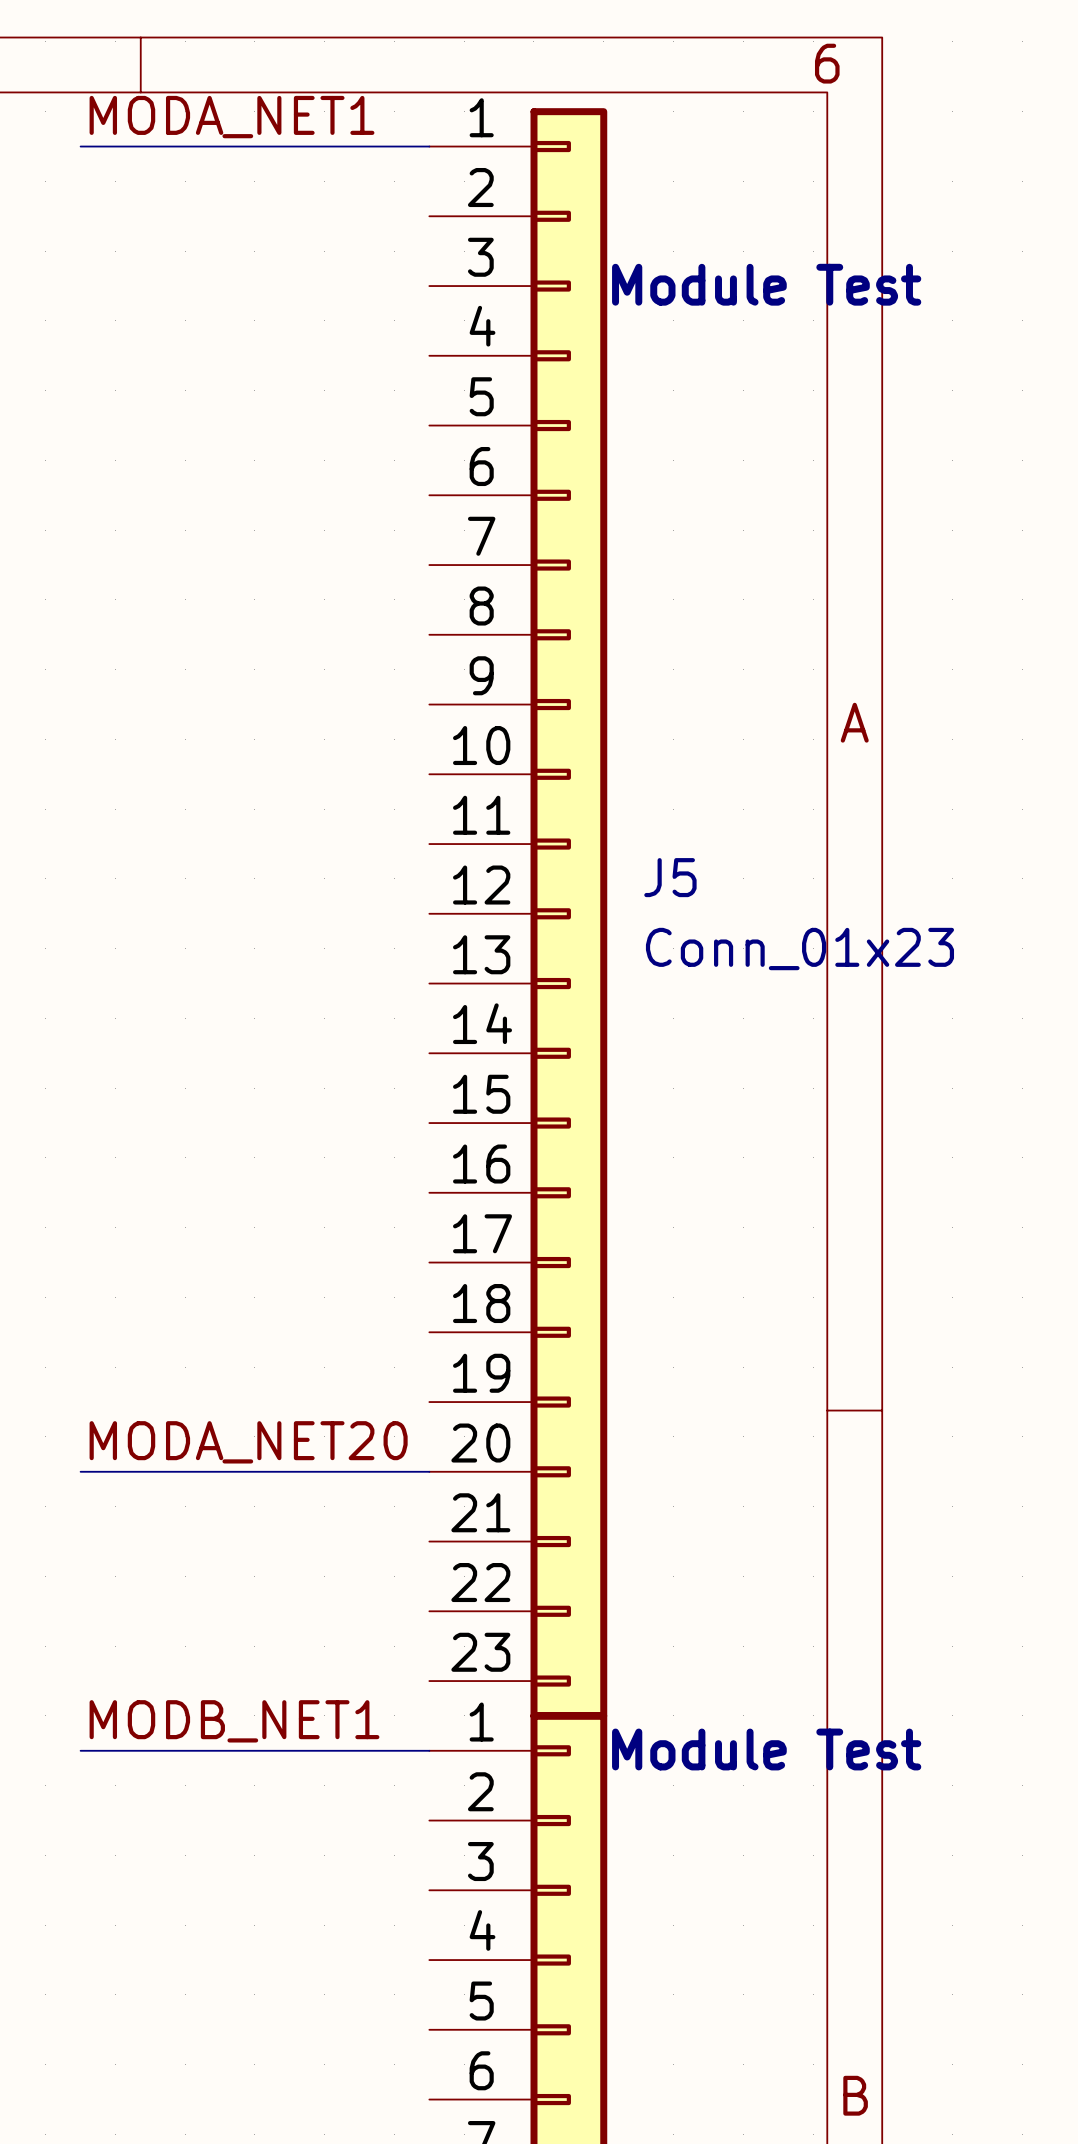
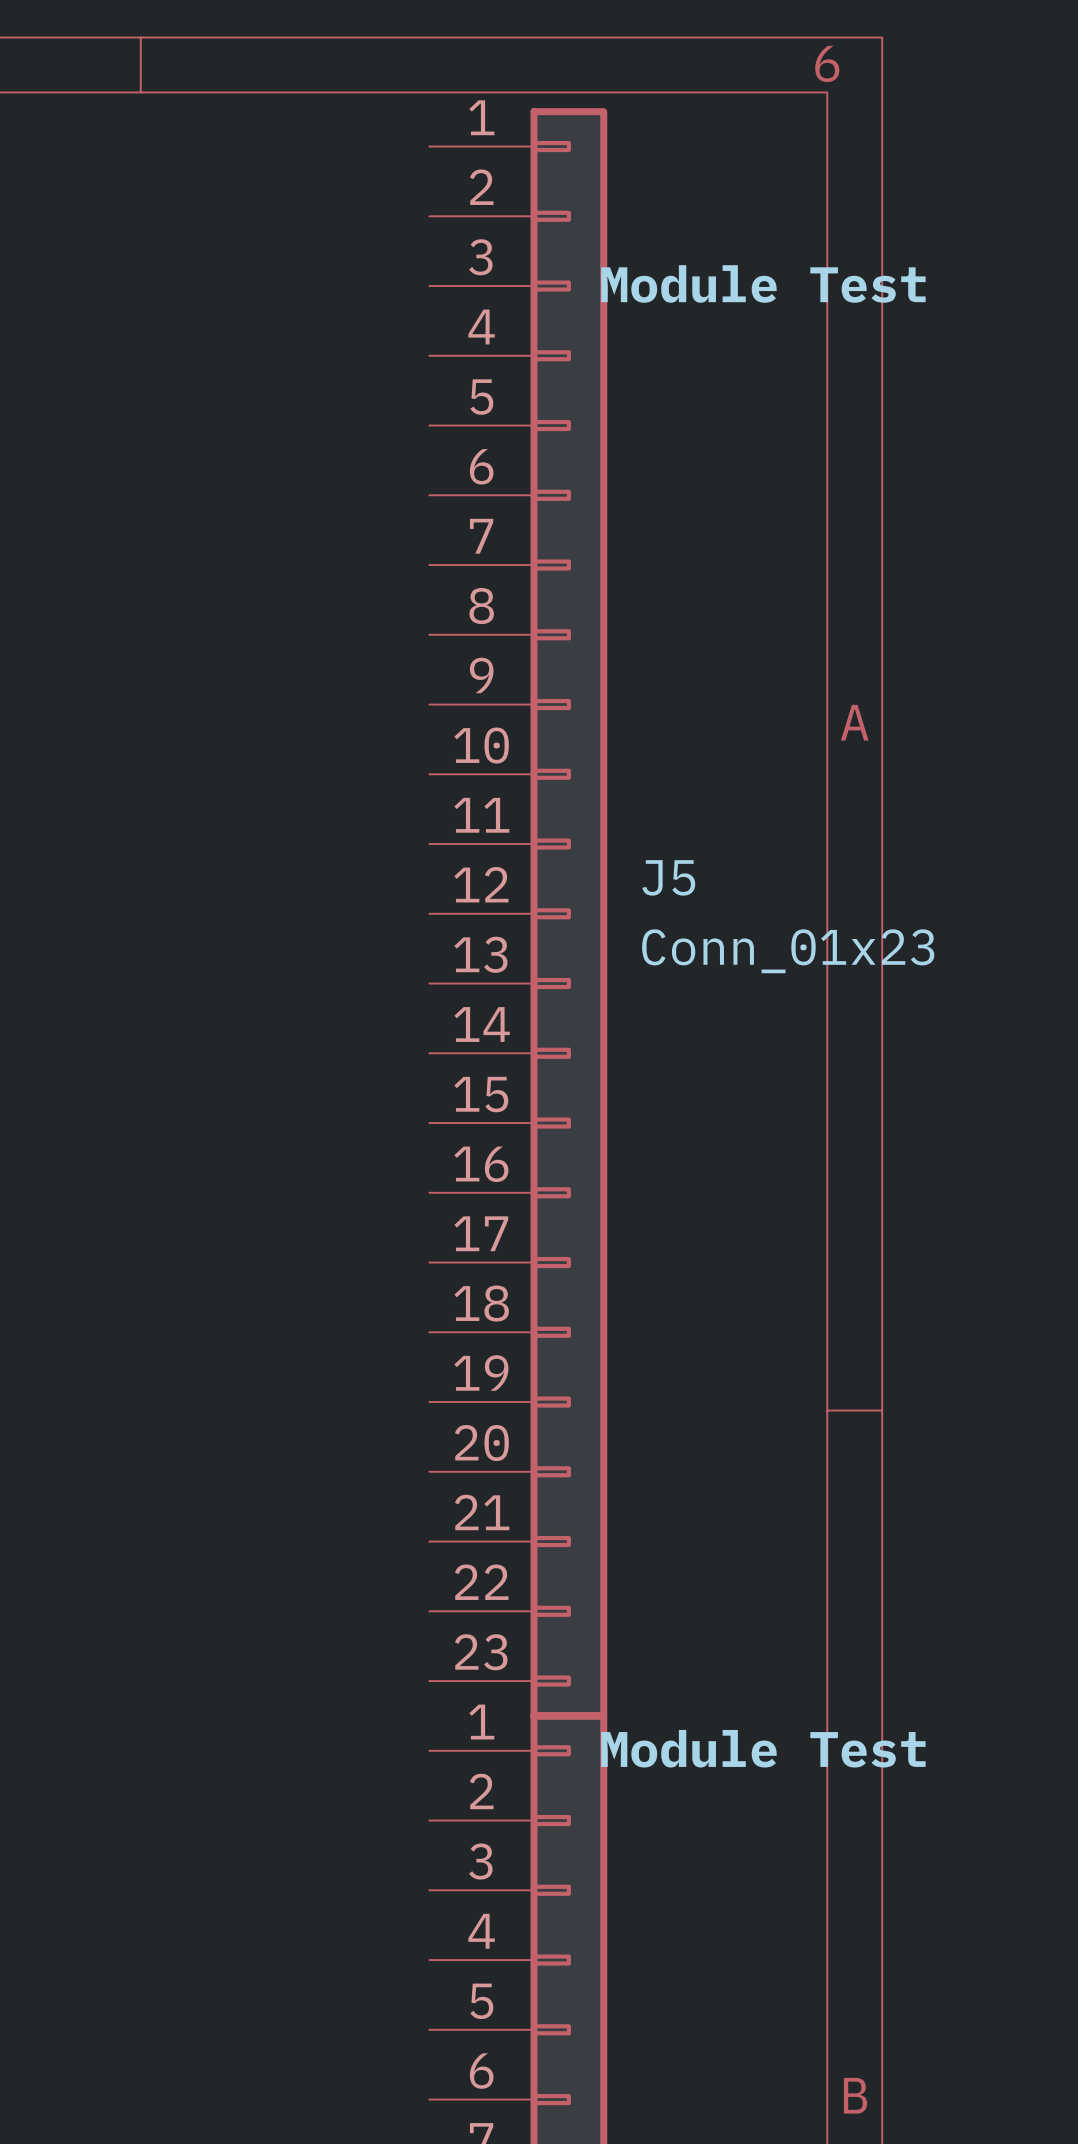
label: MODA_NET1 (232, 117) -> none
wire: (80, 146) (429, 146) -> none
label: MODA_NET20 (248, 1442) -> none
wire: (80, 1471) (429, 1471) -> none
label: MODB_NET1 (234, 1721) -> none
wire: (80, 1750) (429, 1750) -> none

